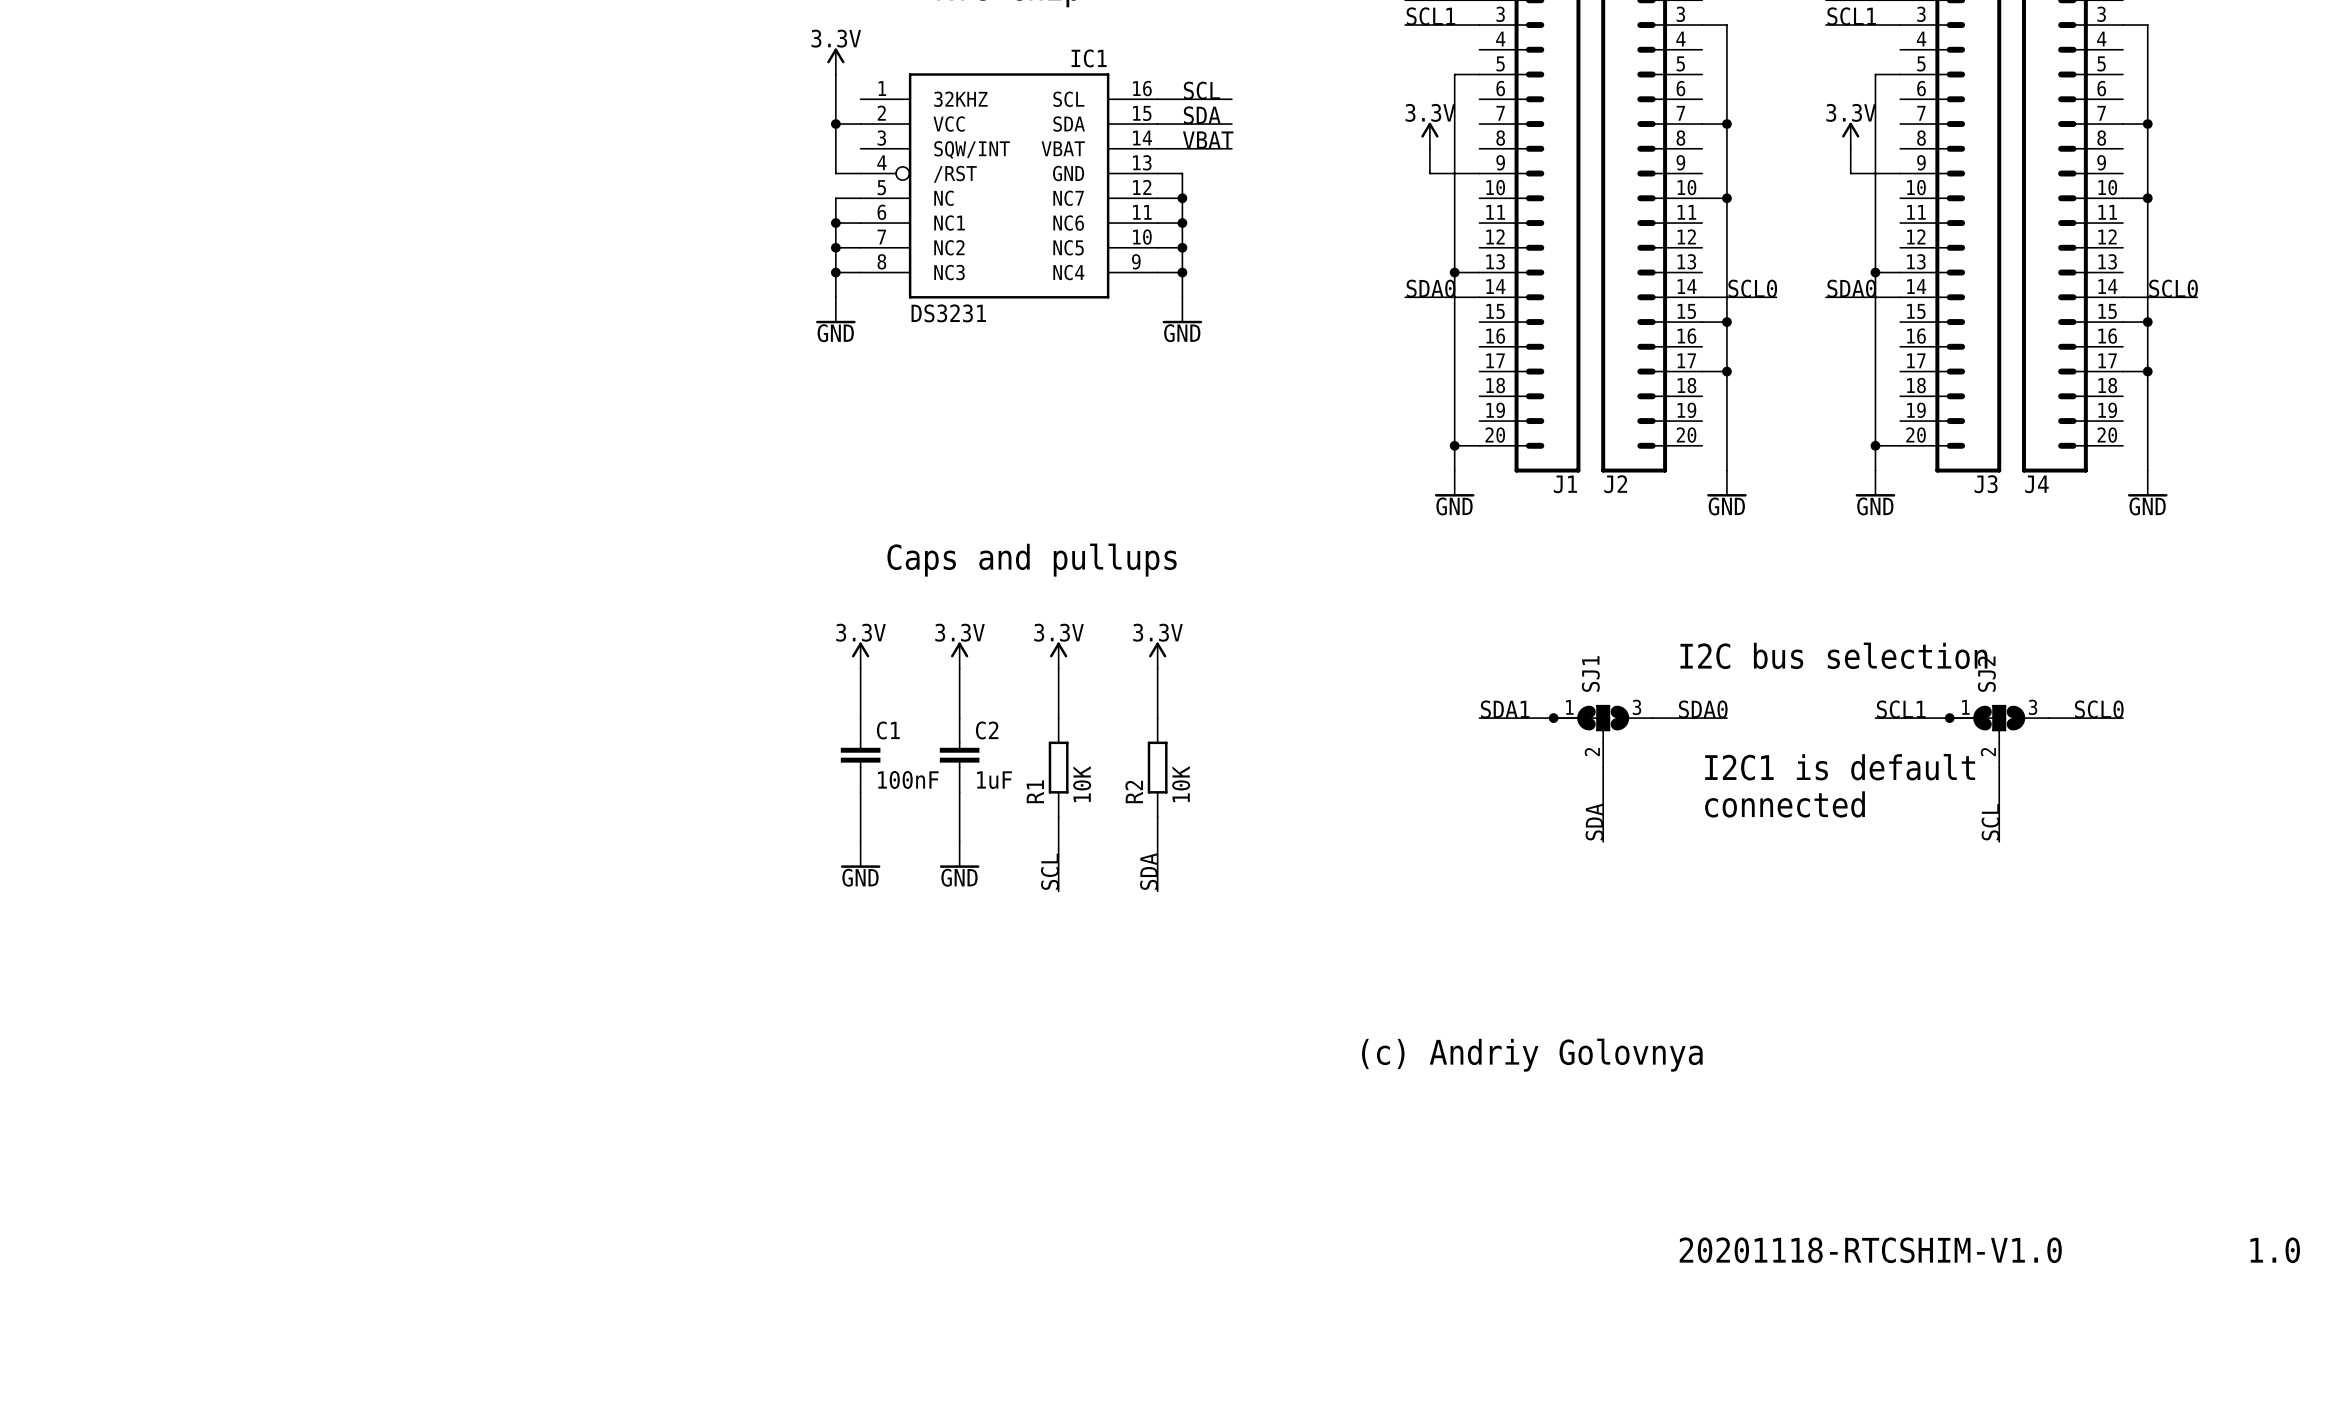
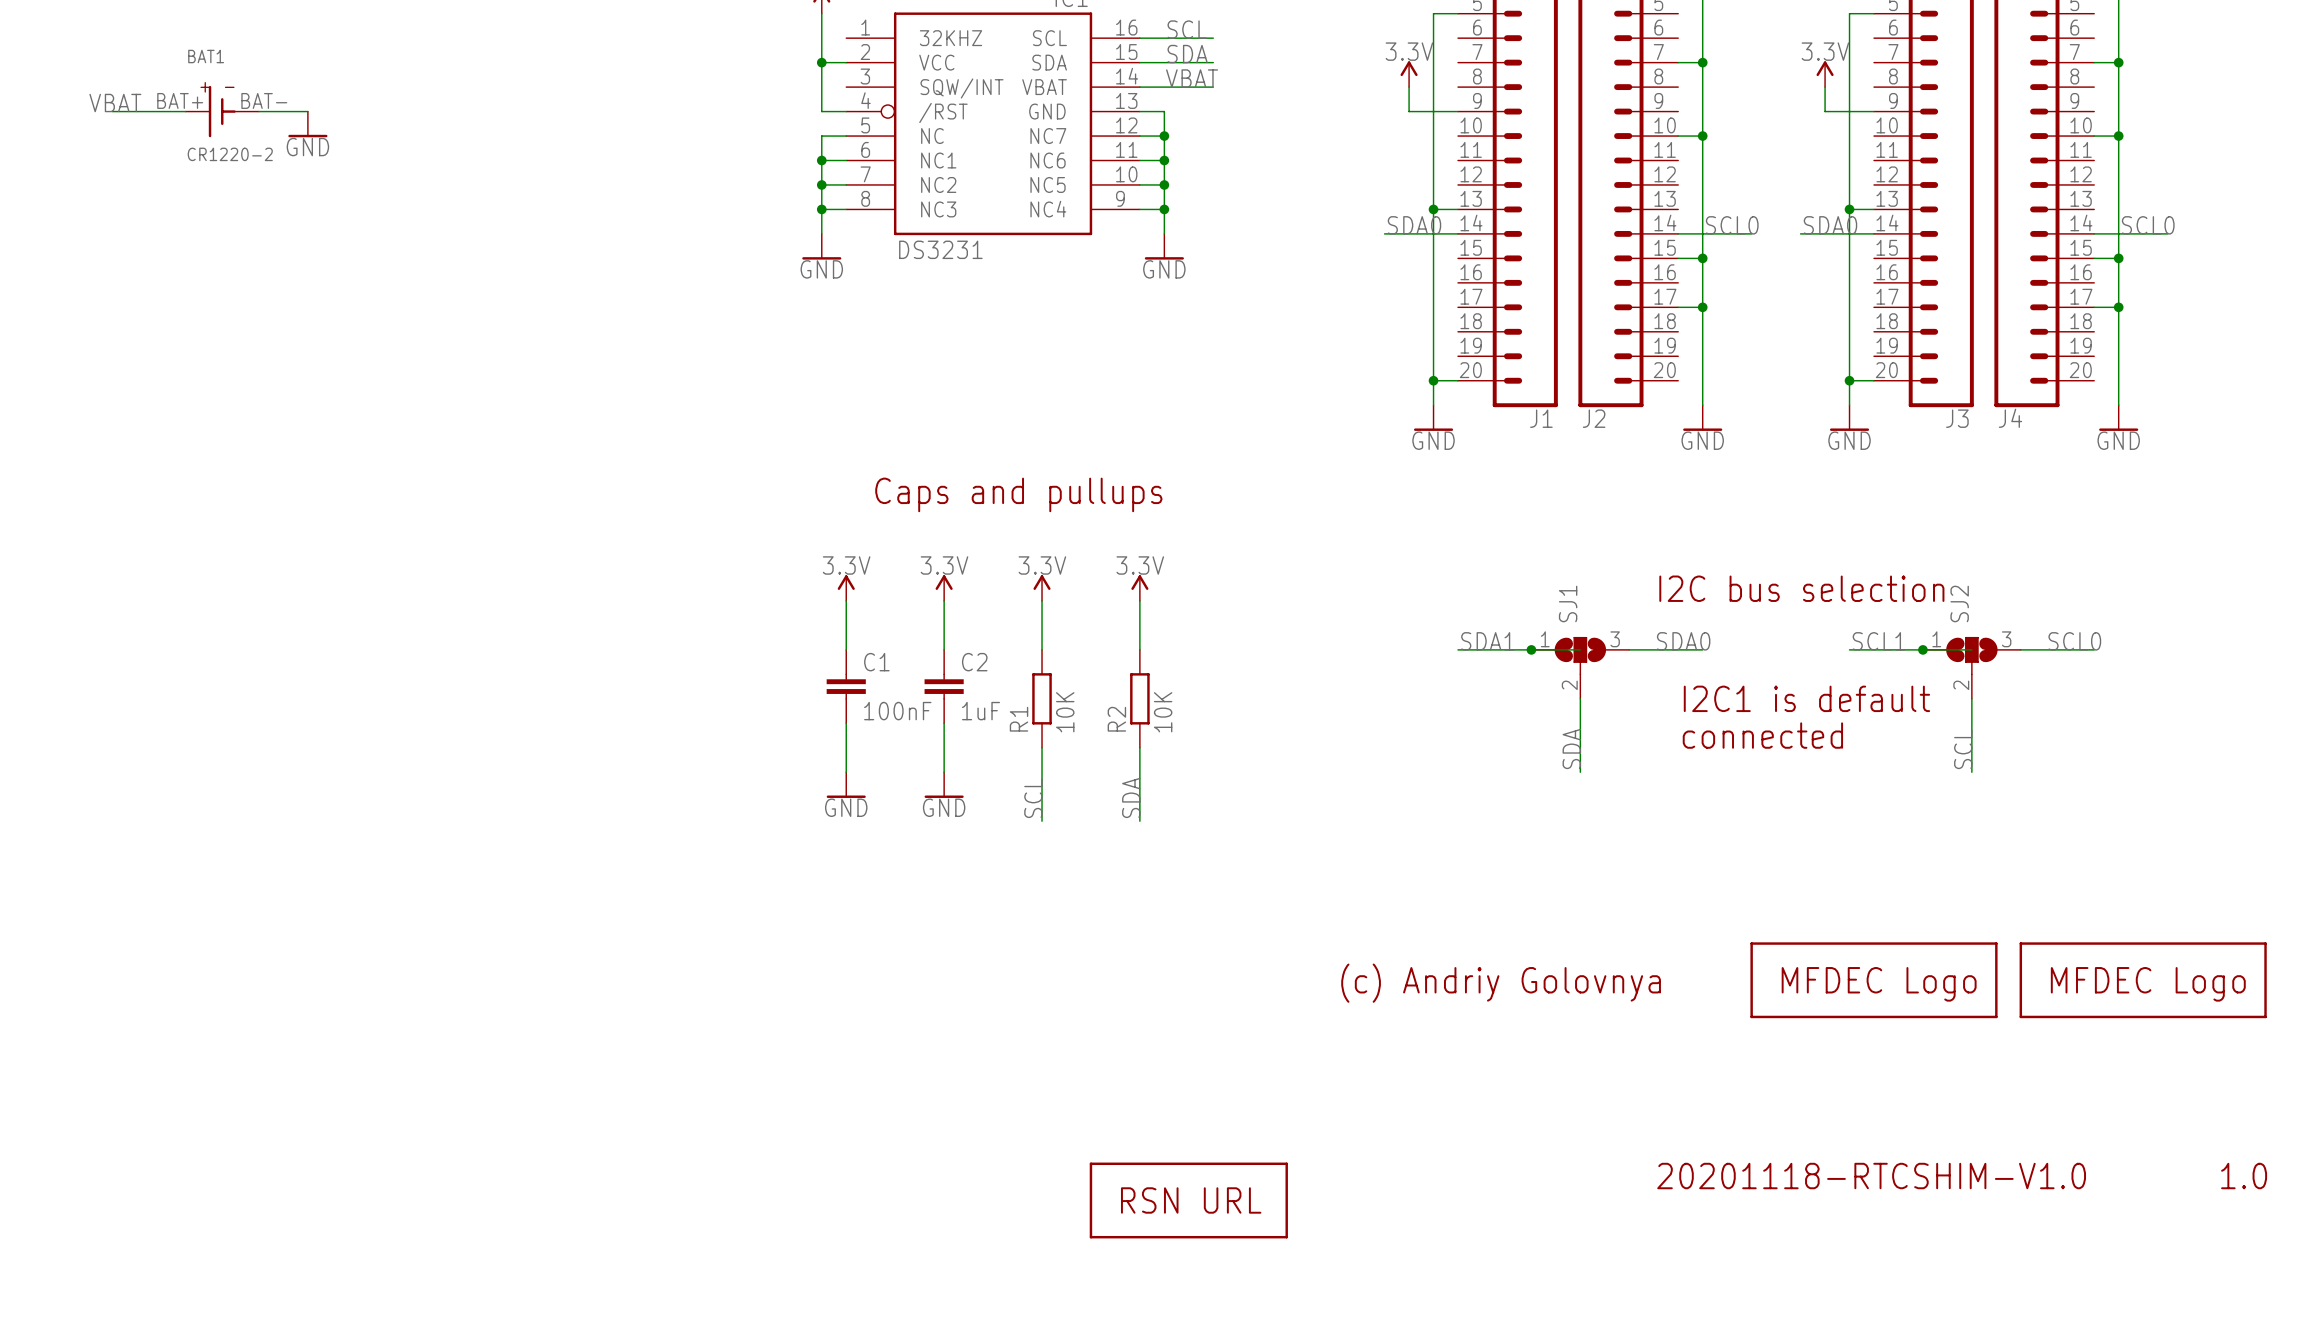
label: none -> VBAT (115, 103)
wire: none -> (112, 111) (185, 111)
BAT1: none -> CR1220-2 (222, 111)
wire: none -> (258, 111) (307, 111)
power symbol: none -> GND (307, 124)
part: none -> (1873, 980)
part: none -> (2143, 980)
part: none -> (1188, 1200)

